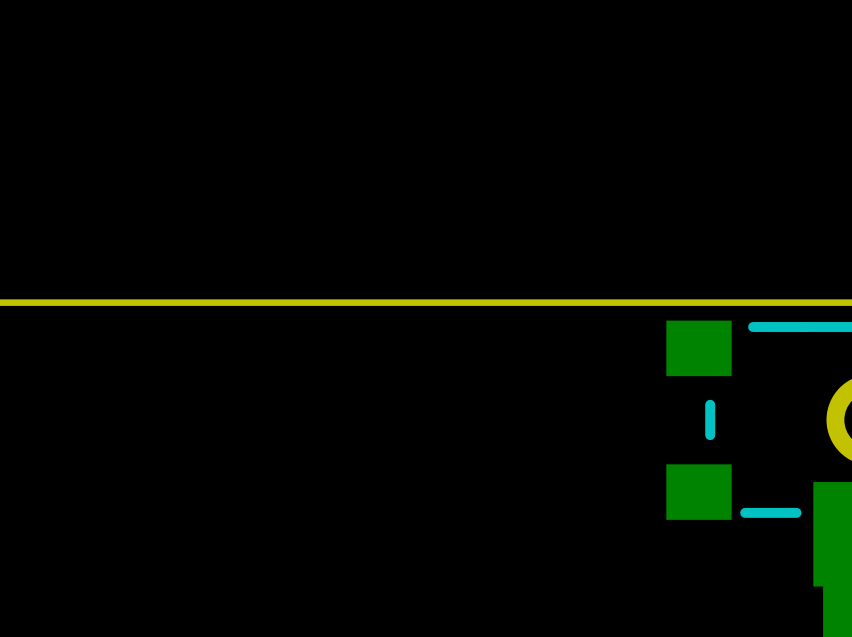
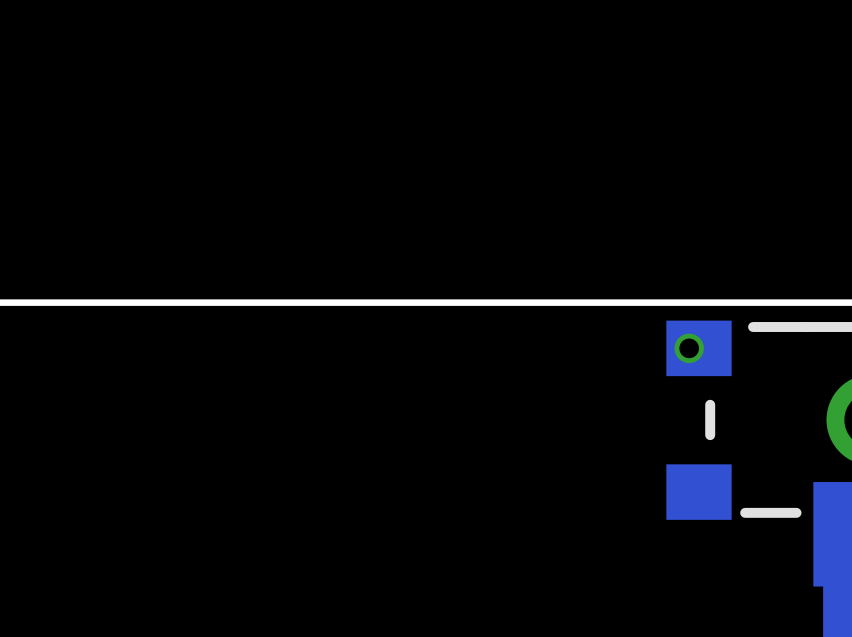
via: none -> (689, 348)

